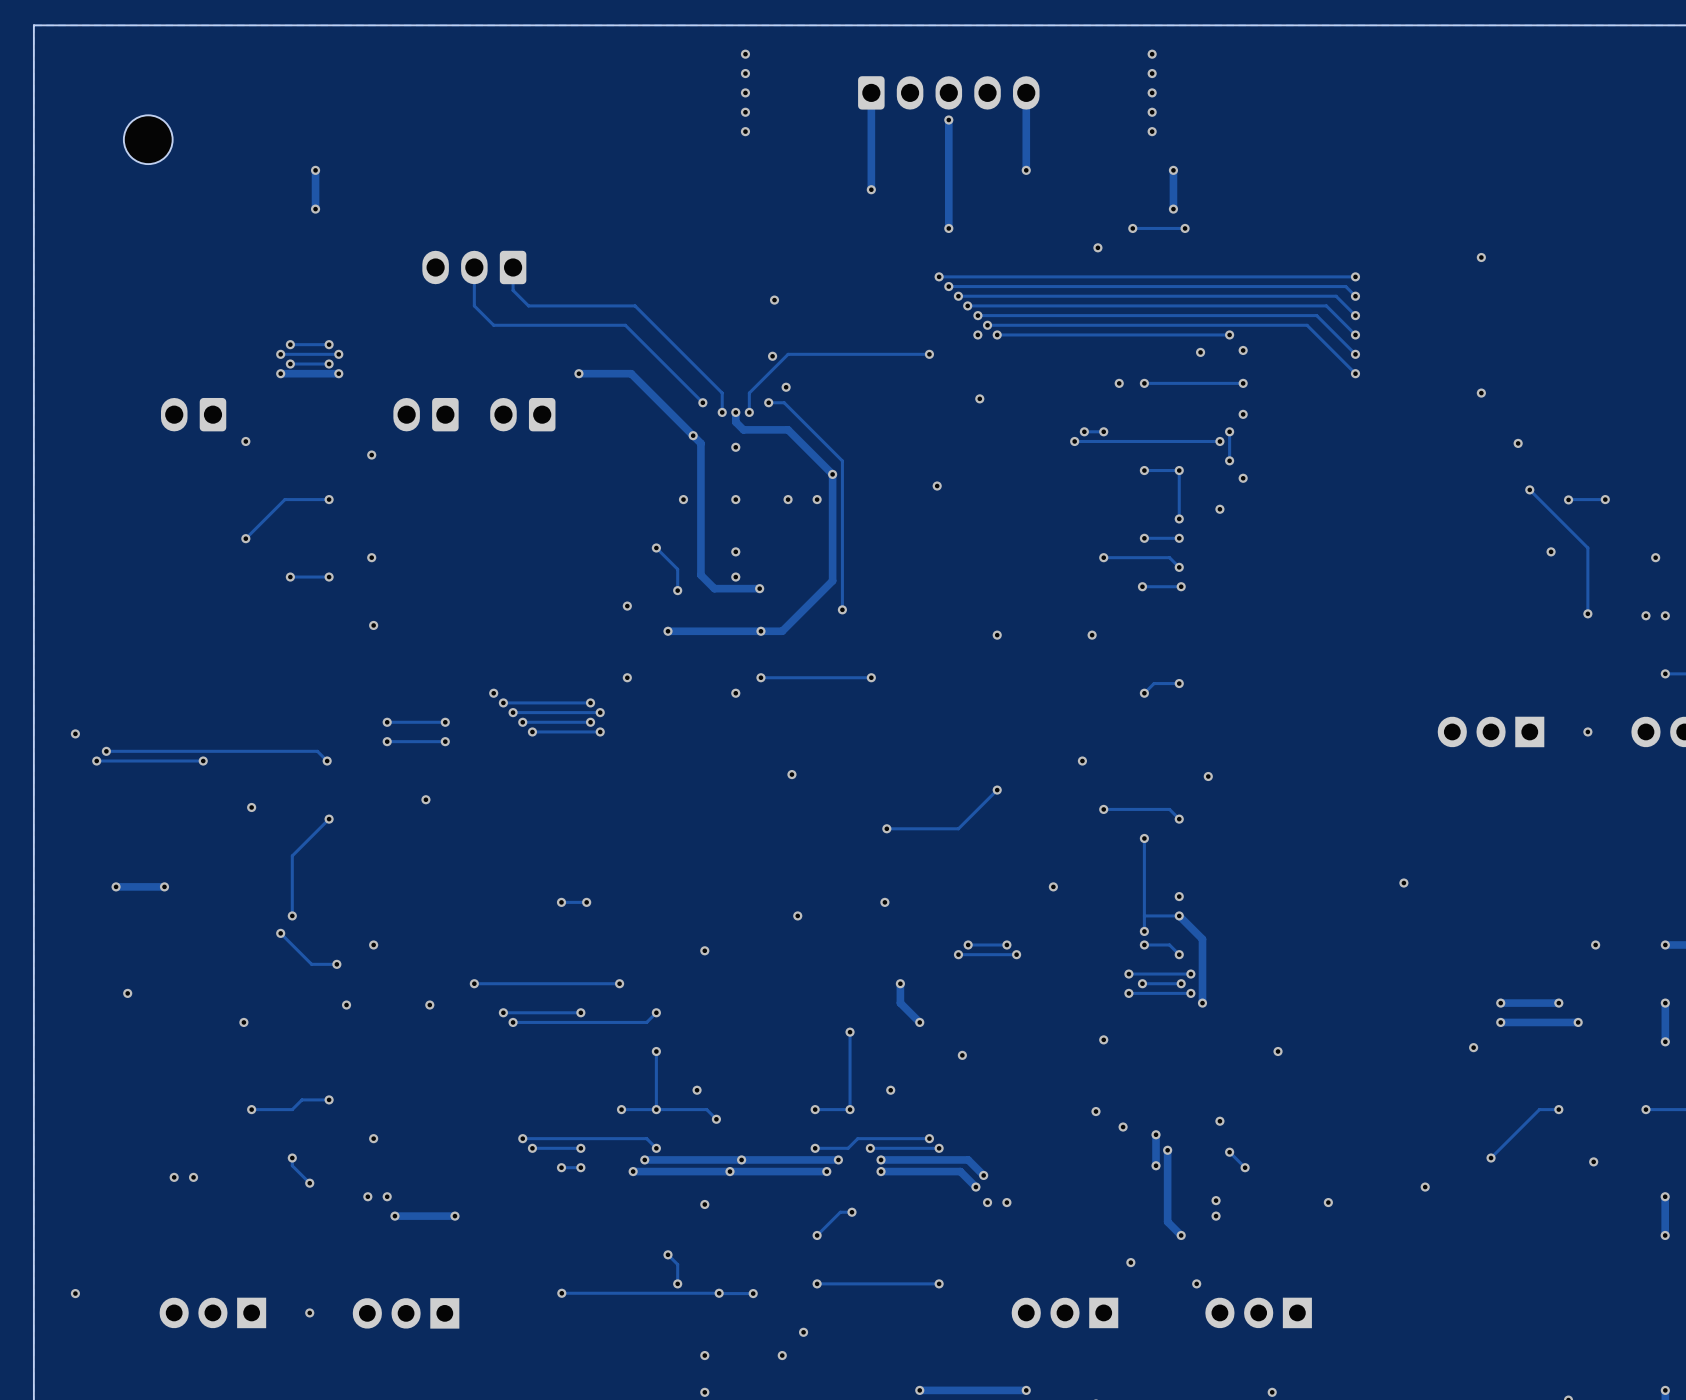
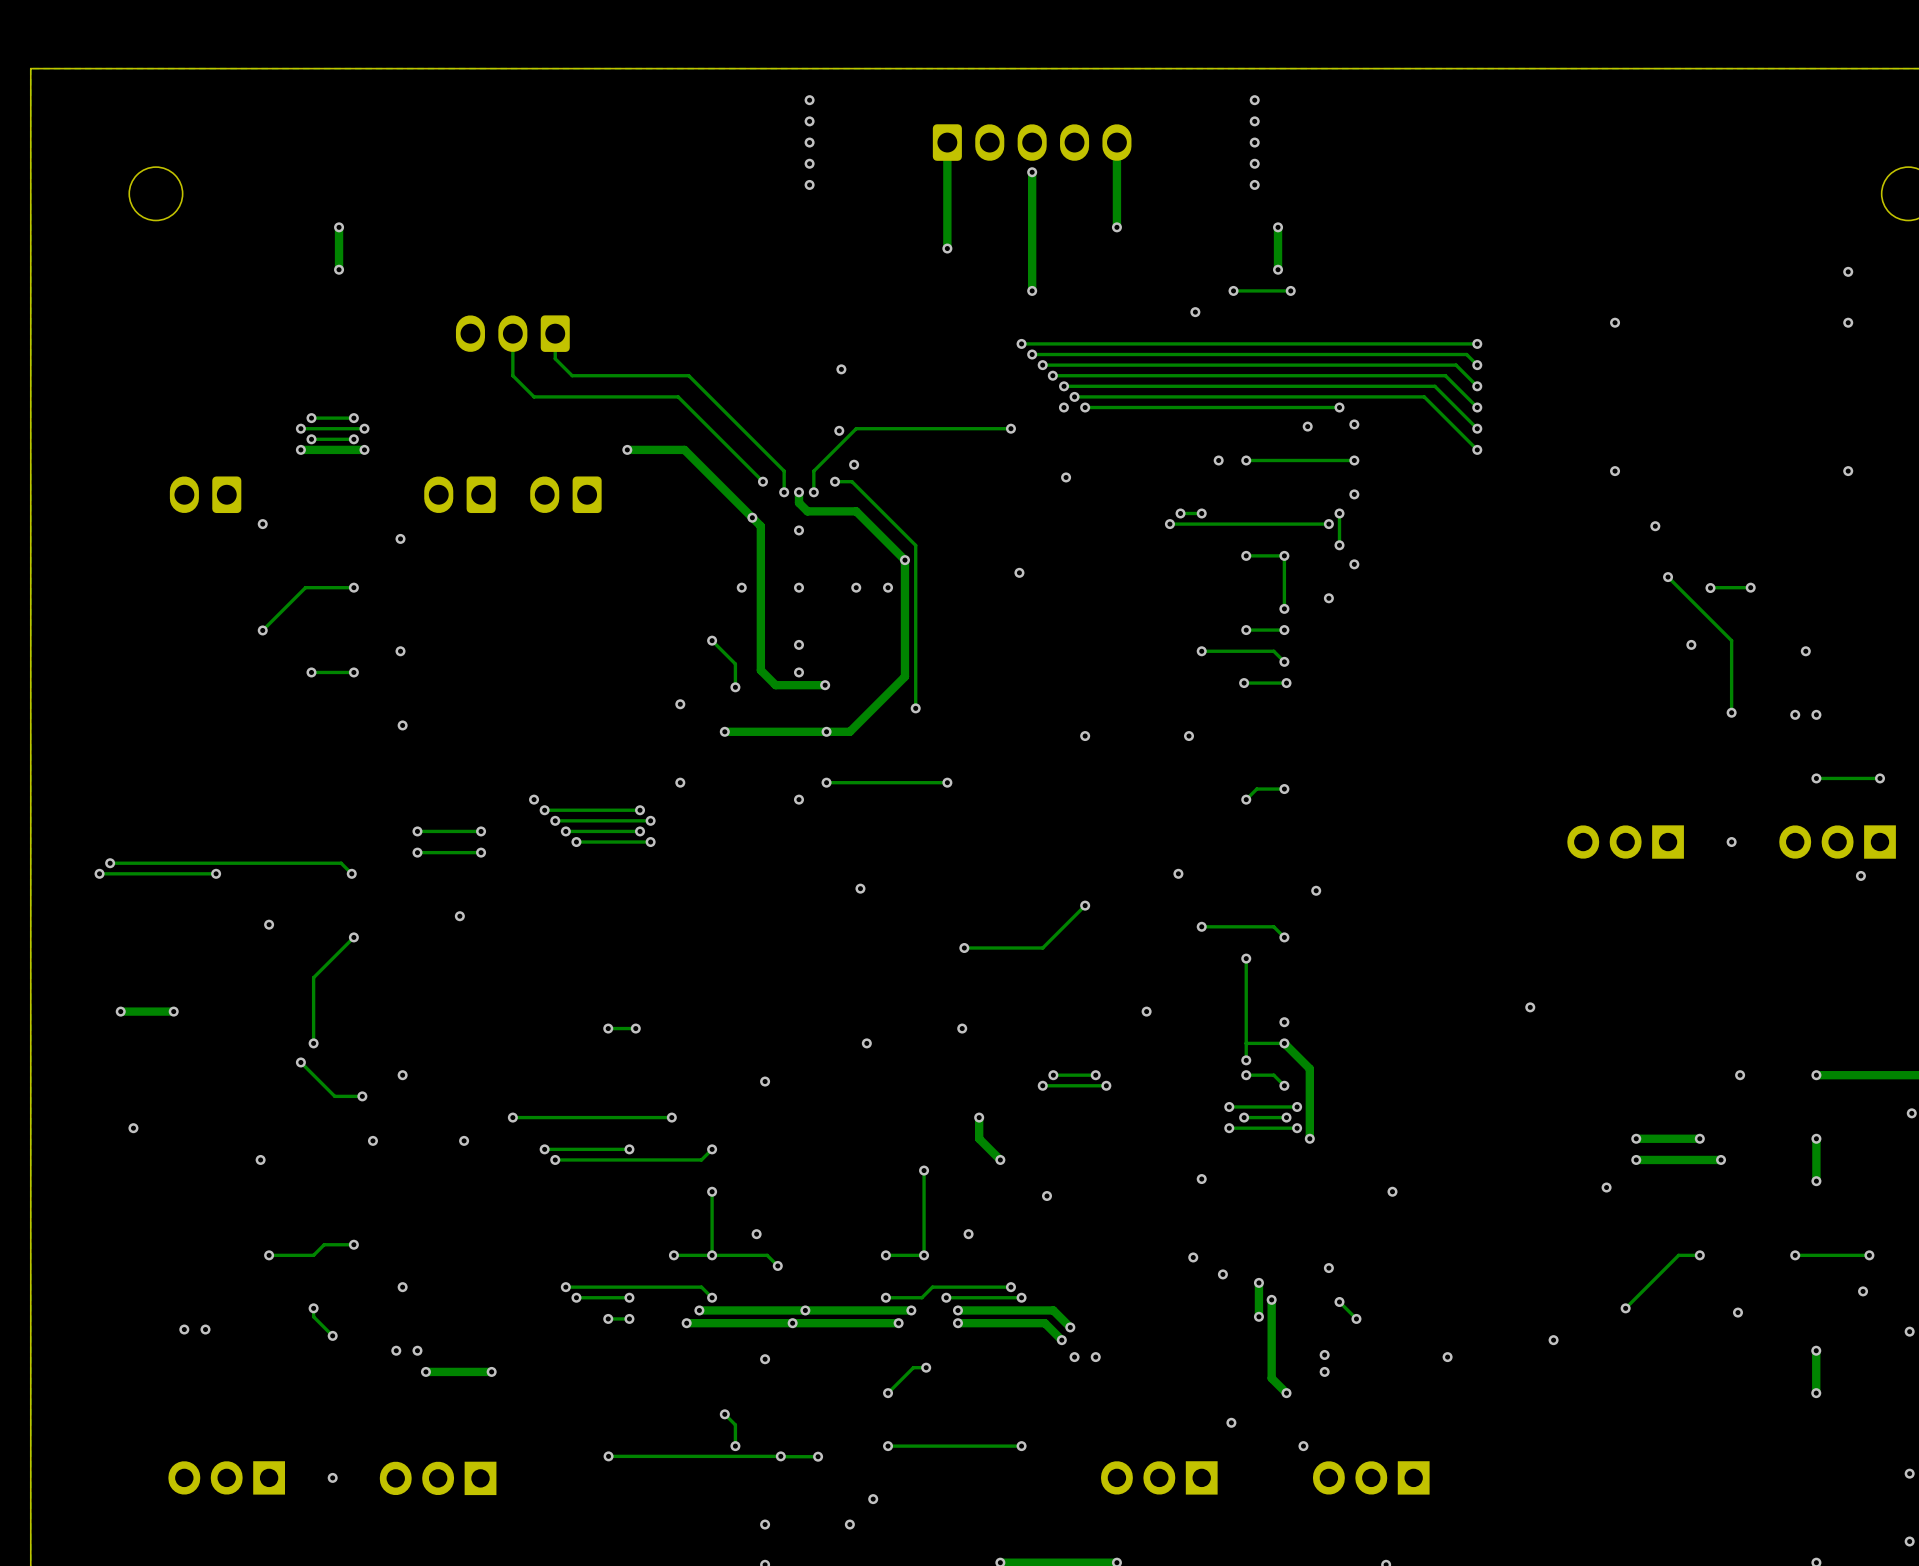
via: (75, 733) -> none
via: (75, 1293) -> none

